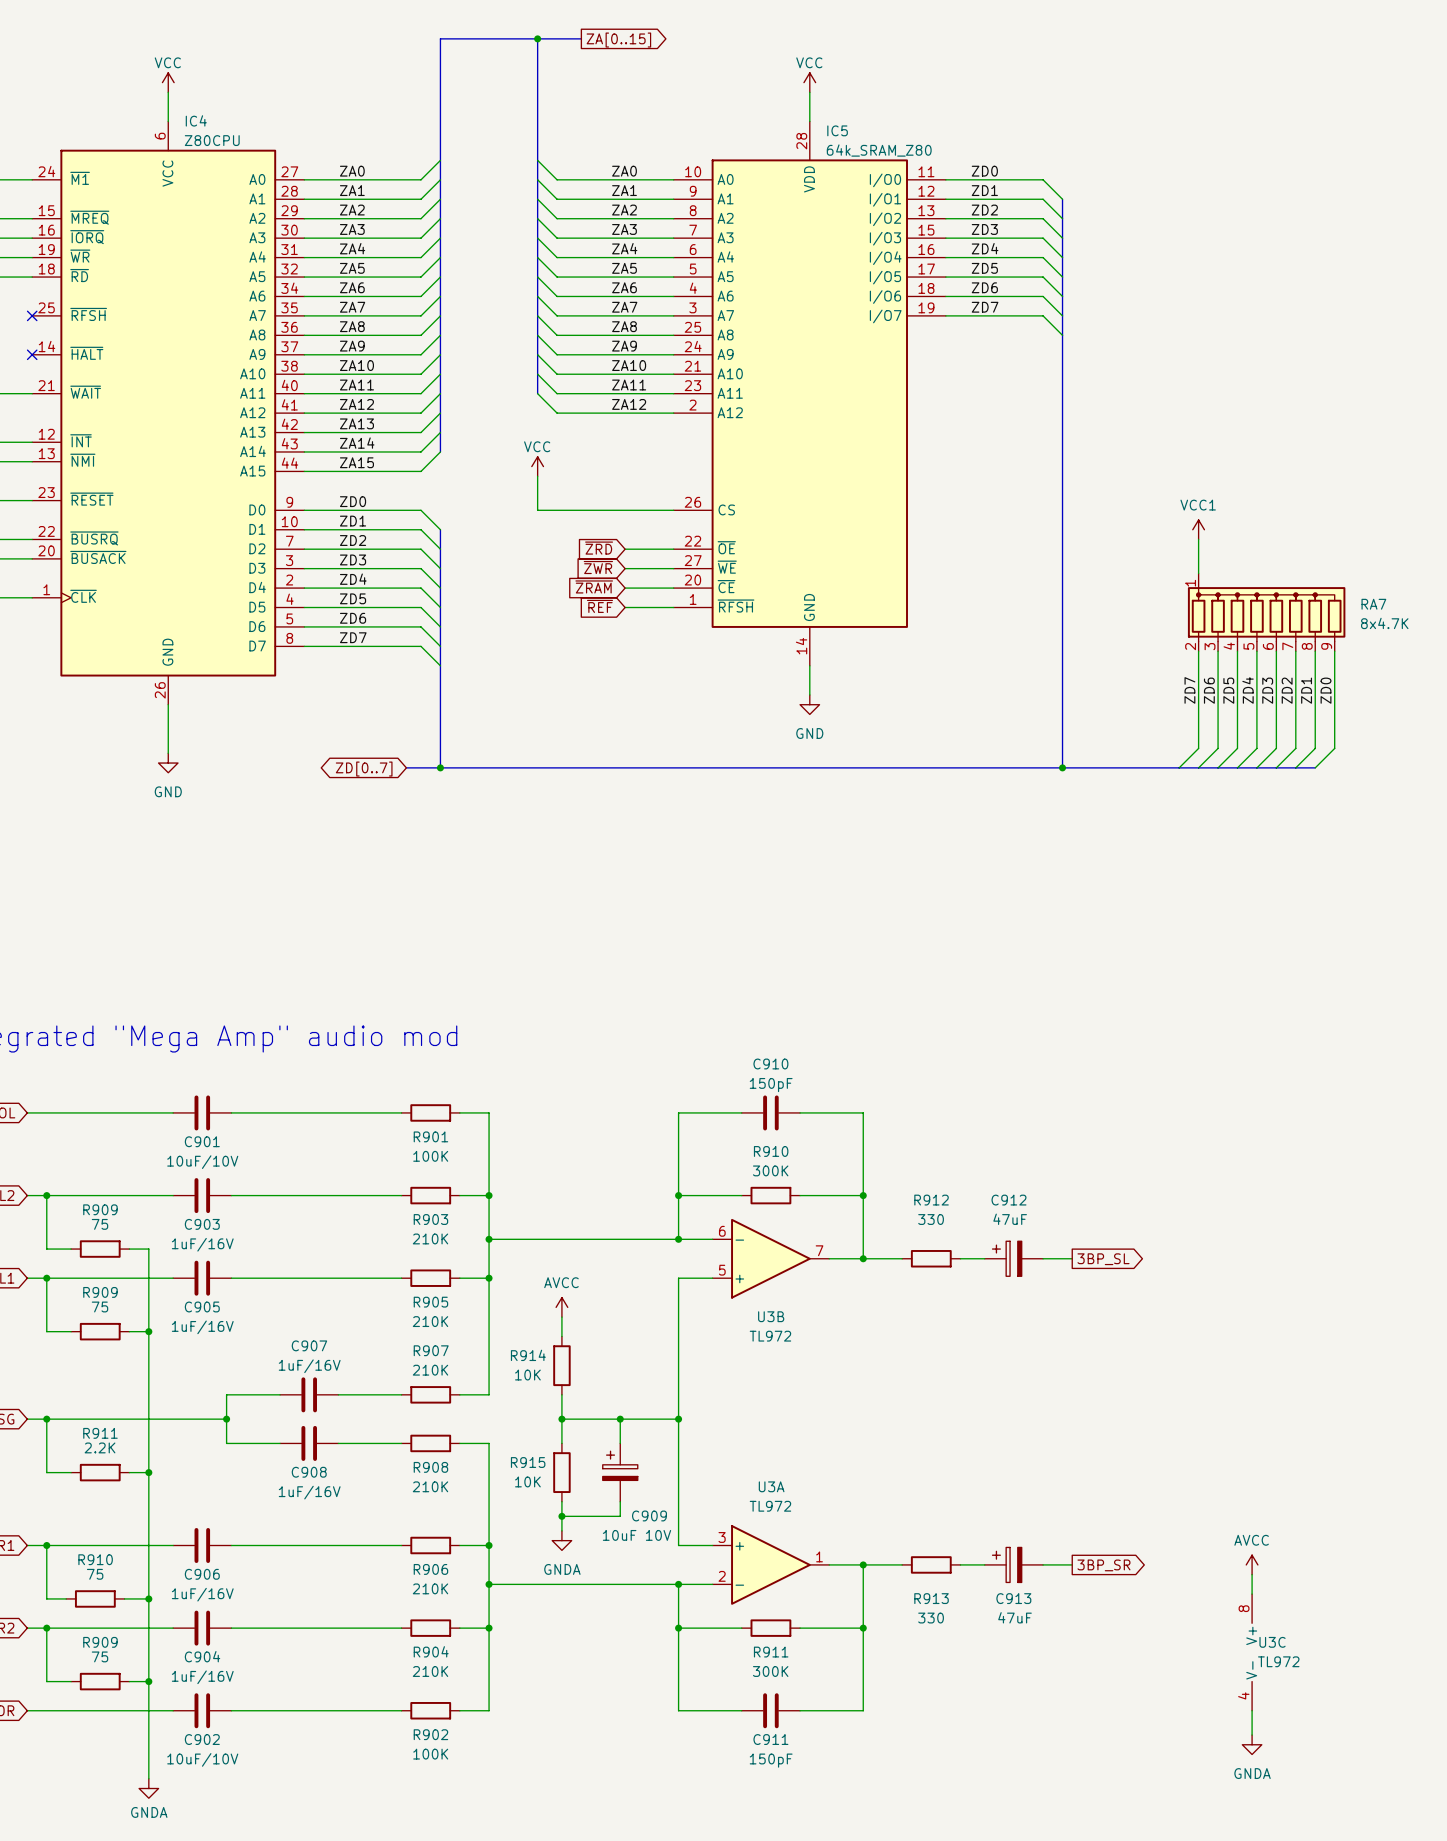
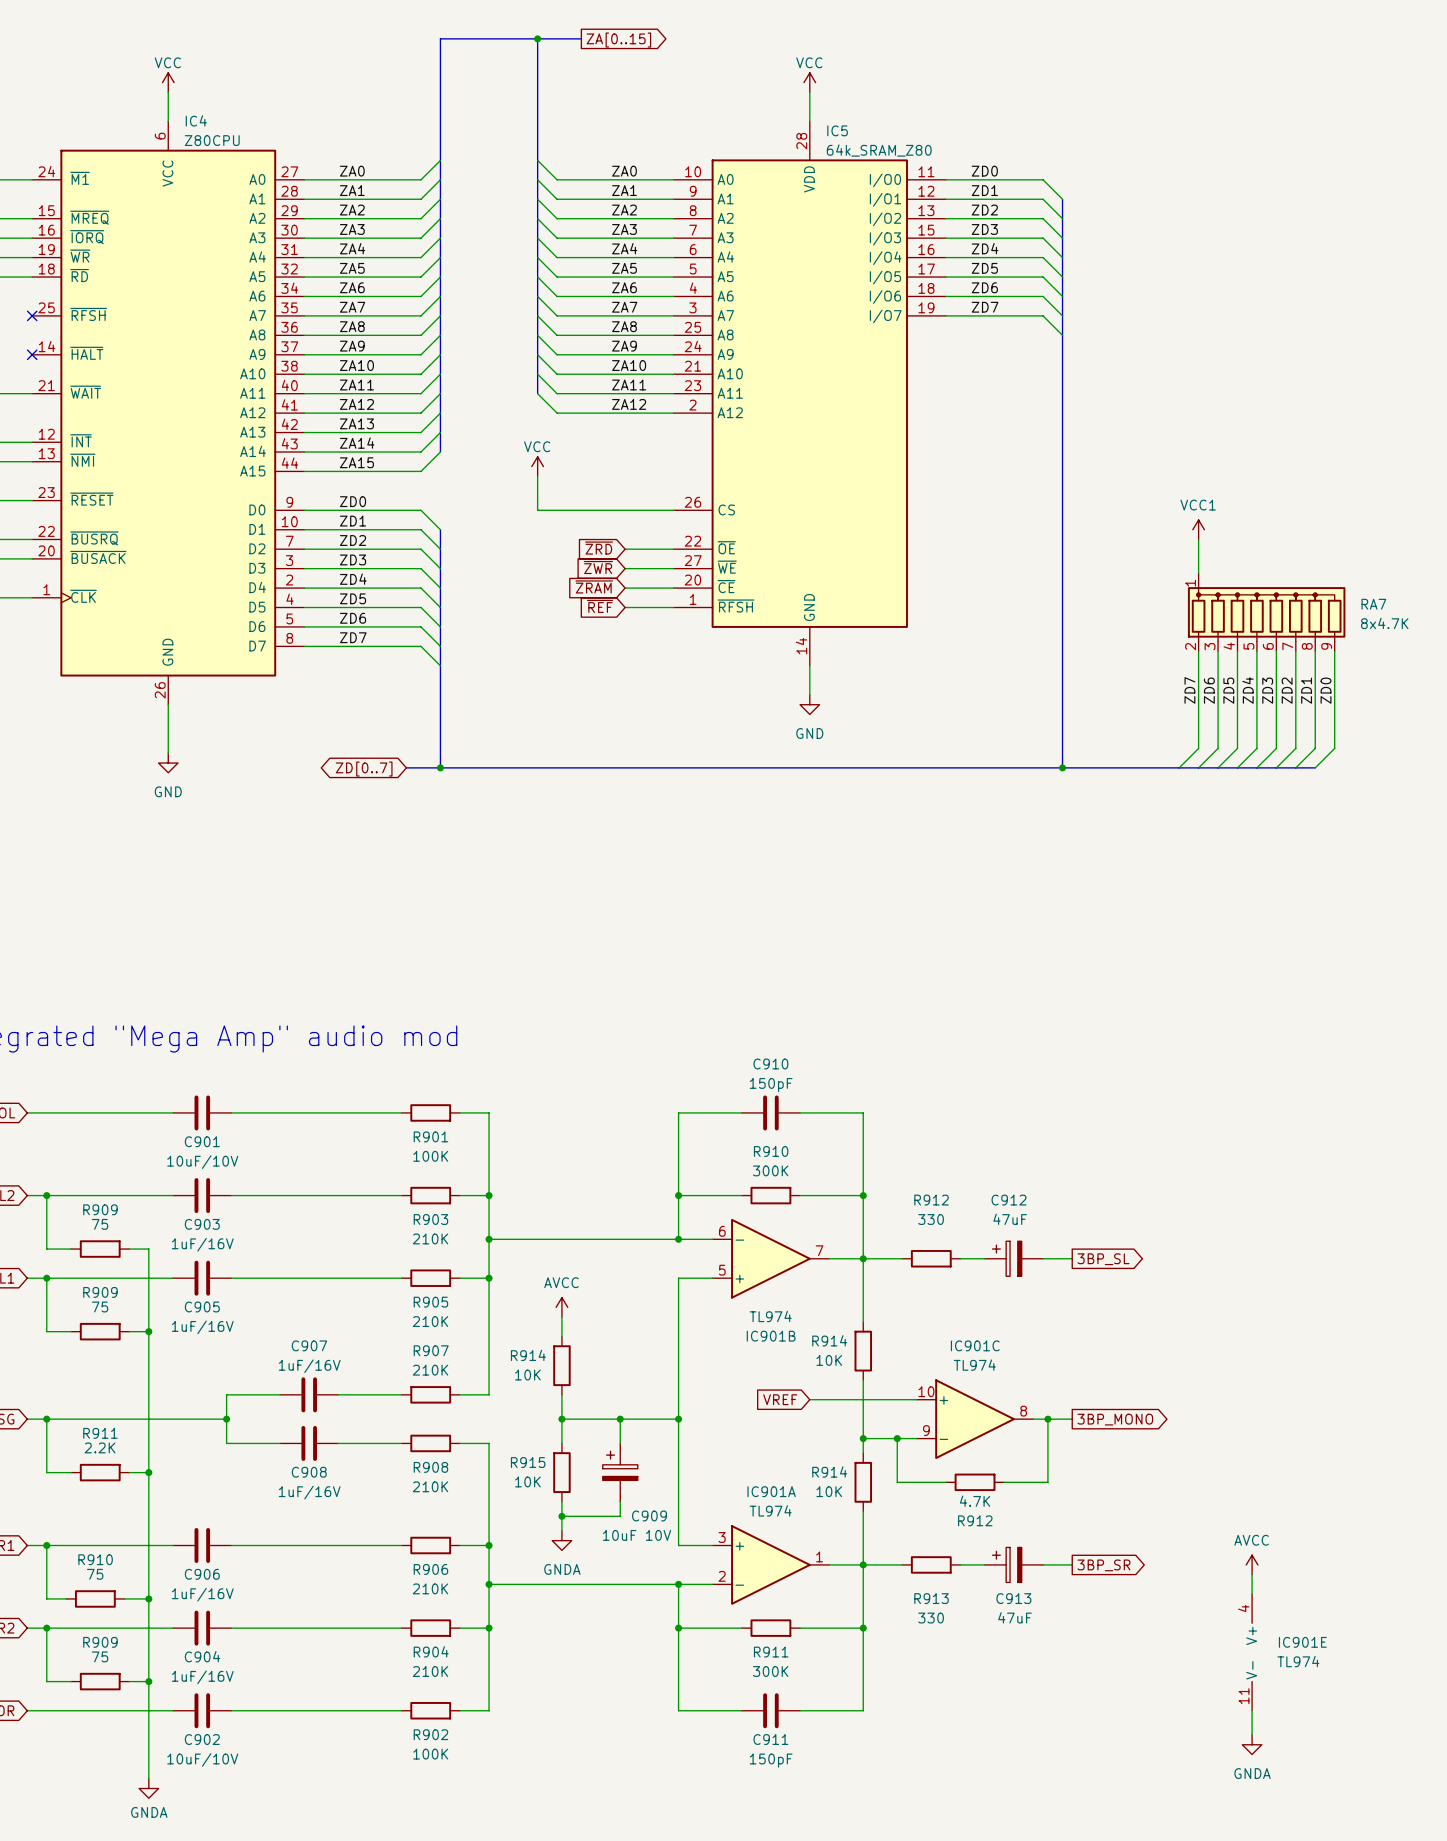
wire: none -> (863, 1258) (863, 1321)
U3B name: U3B (771, 1316) -> IC901B (771, 1336)
U3B value: TL972 (770, 1336) -> TL974 (770, 1316)
R914: none -> 10K (863, 1351)
wire: none -> (863, 1380) (863, 1453)
global label: none -> VREF (780, 1399)
wire: none -> (809, 1399) (916, 1399)
IC901C: none -> TL974 (975, 1419)
wire: none -> (1033, 1419) (1072, 1419)
wire: none -> (1047, 1419) (1047, 1482) (1004, 1482)
junction: none -> (1047, 1419)
global label: none -> 3BP_MONO (1115, 1419)
wire: none -> (863, 1438) (916, 1438)
junction: none -> (863, 1438)
wire: none -> (897, 1438) (897, 1482) (945, 1482)
junction: none -> (897, 1438)
R914: none -> 10K (863, 1482)
R912: none -> 4.7K (975, 1482)
U3A name: U3A (771, 1486) -> IC901A (771, 1491)
U3A value: TL972 (770, 1506) -> TL974 (770, 1510)
wire: none -> (863, 1511) (863, 1564)
U3C pin number: 8 (1244, 1608) -> 4 (1243, 1608)
U3C name: U3C (1272, 1642) -> IC901E (1302, 1642)
U3C value: TL972 (1278, 1661) -> TL974 (1298, 1661)
U3C pin number: 4 (1243, 1695) -> 11 (1244, 1696)

